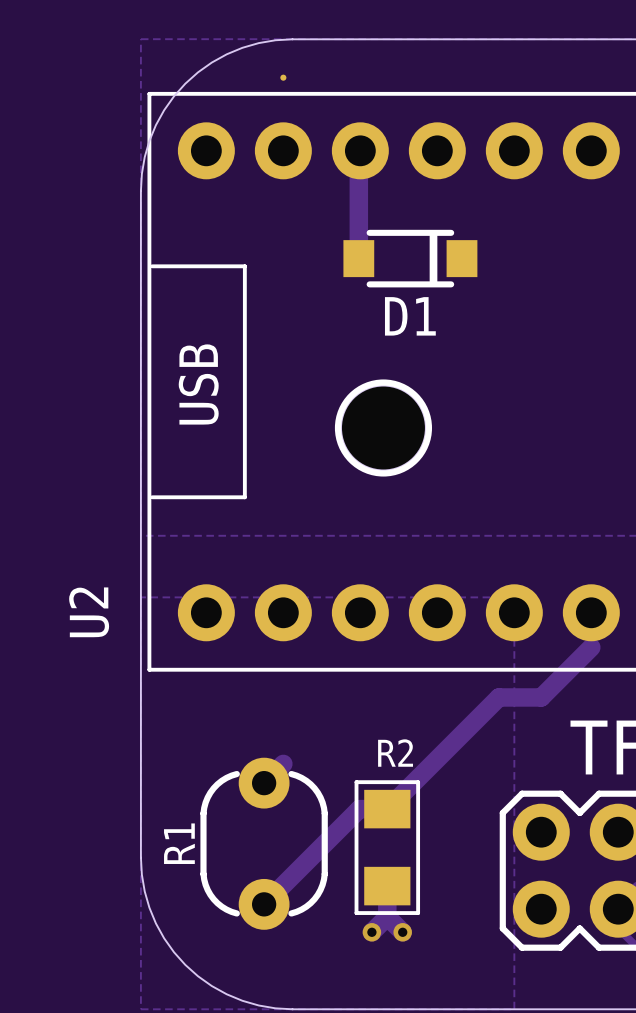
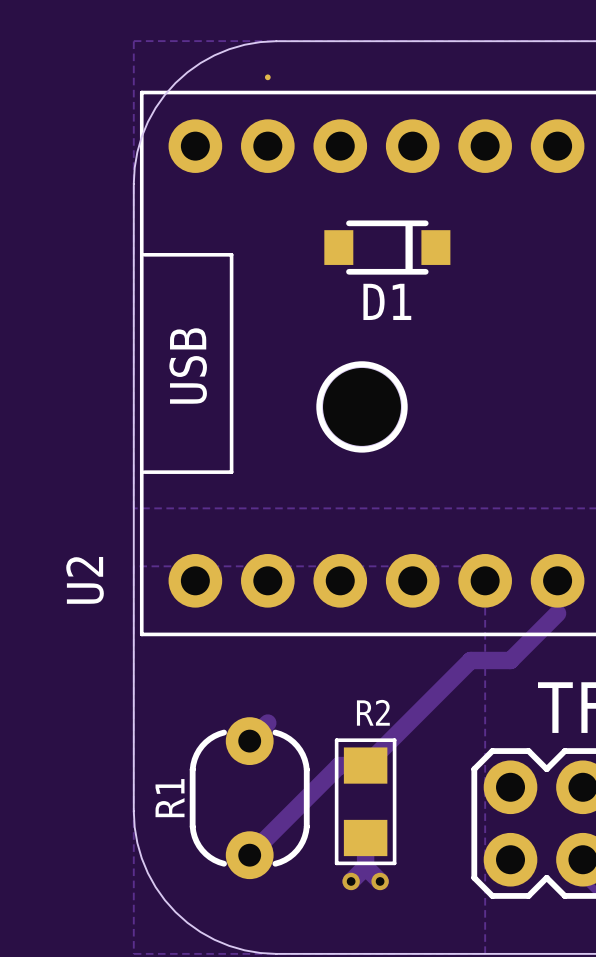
track: (360, 150) (358, 152) (358, 258) -> none

